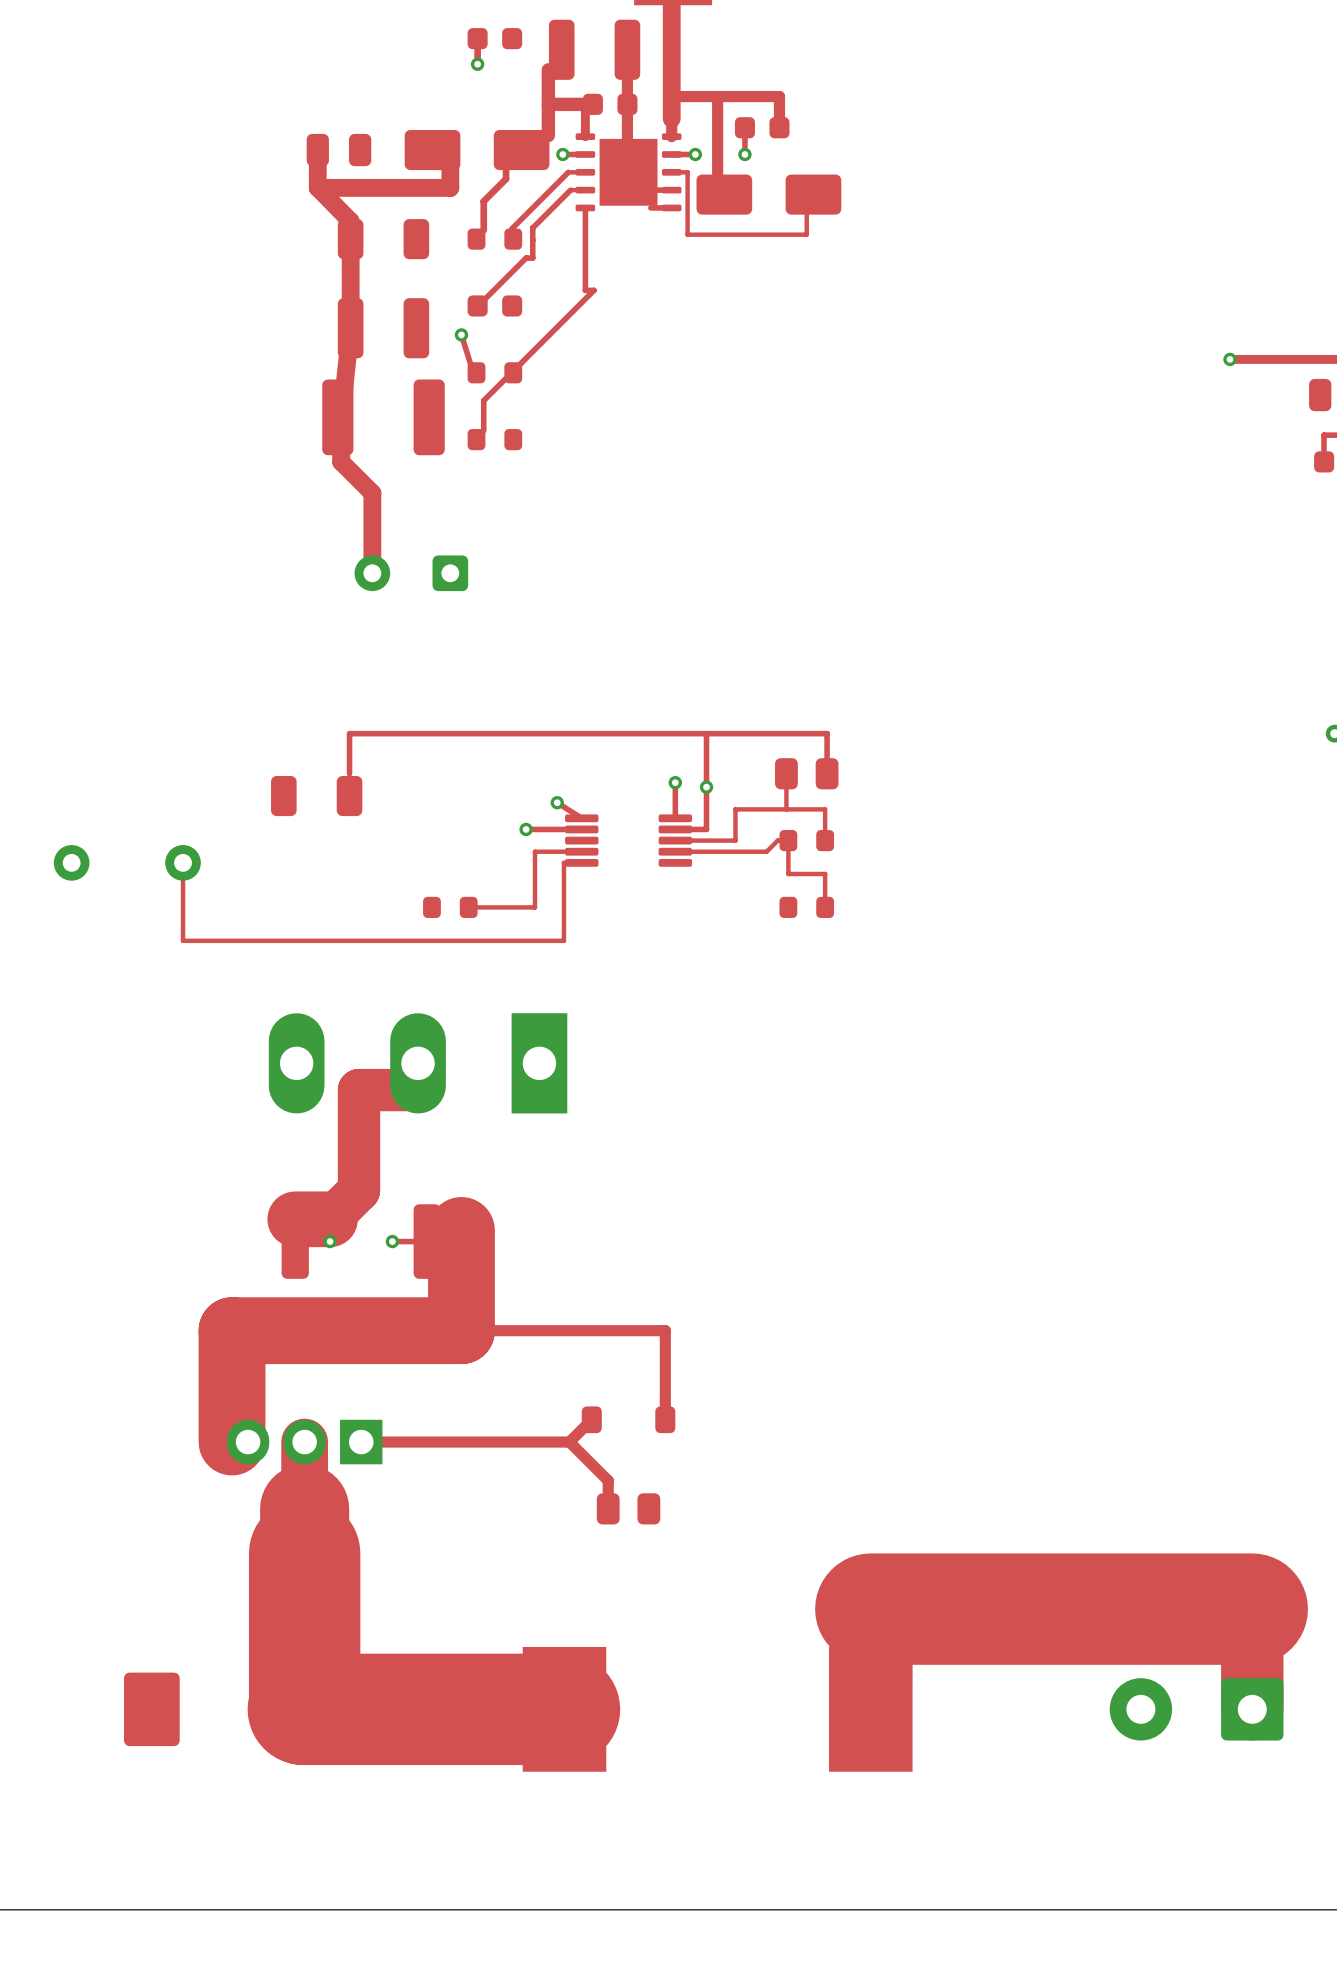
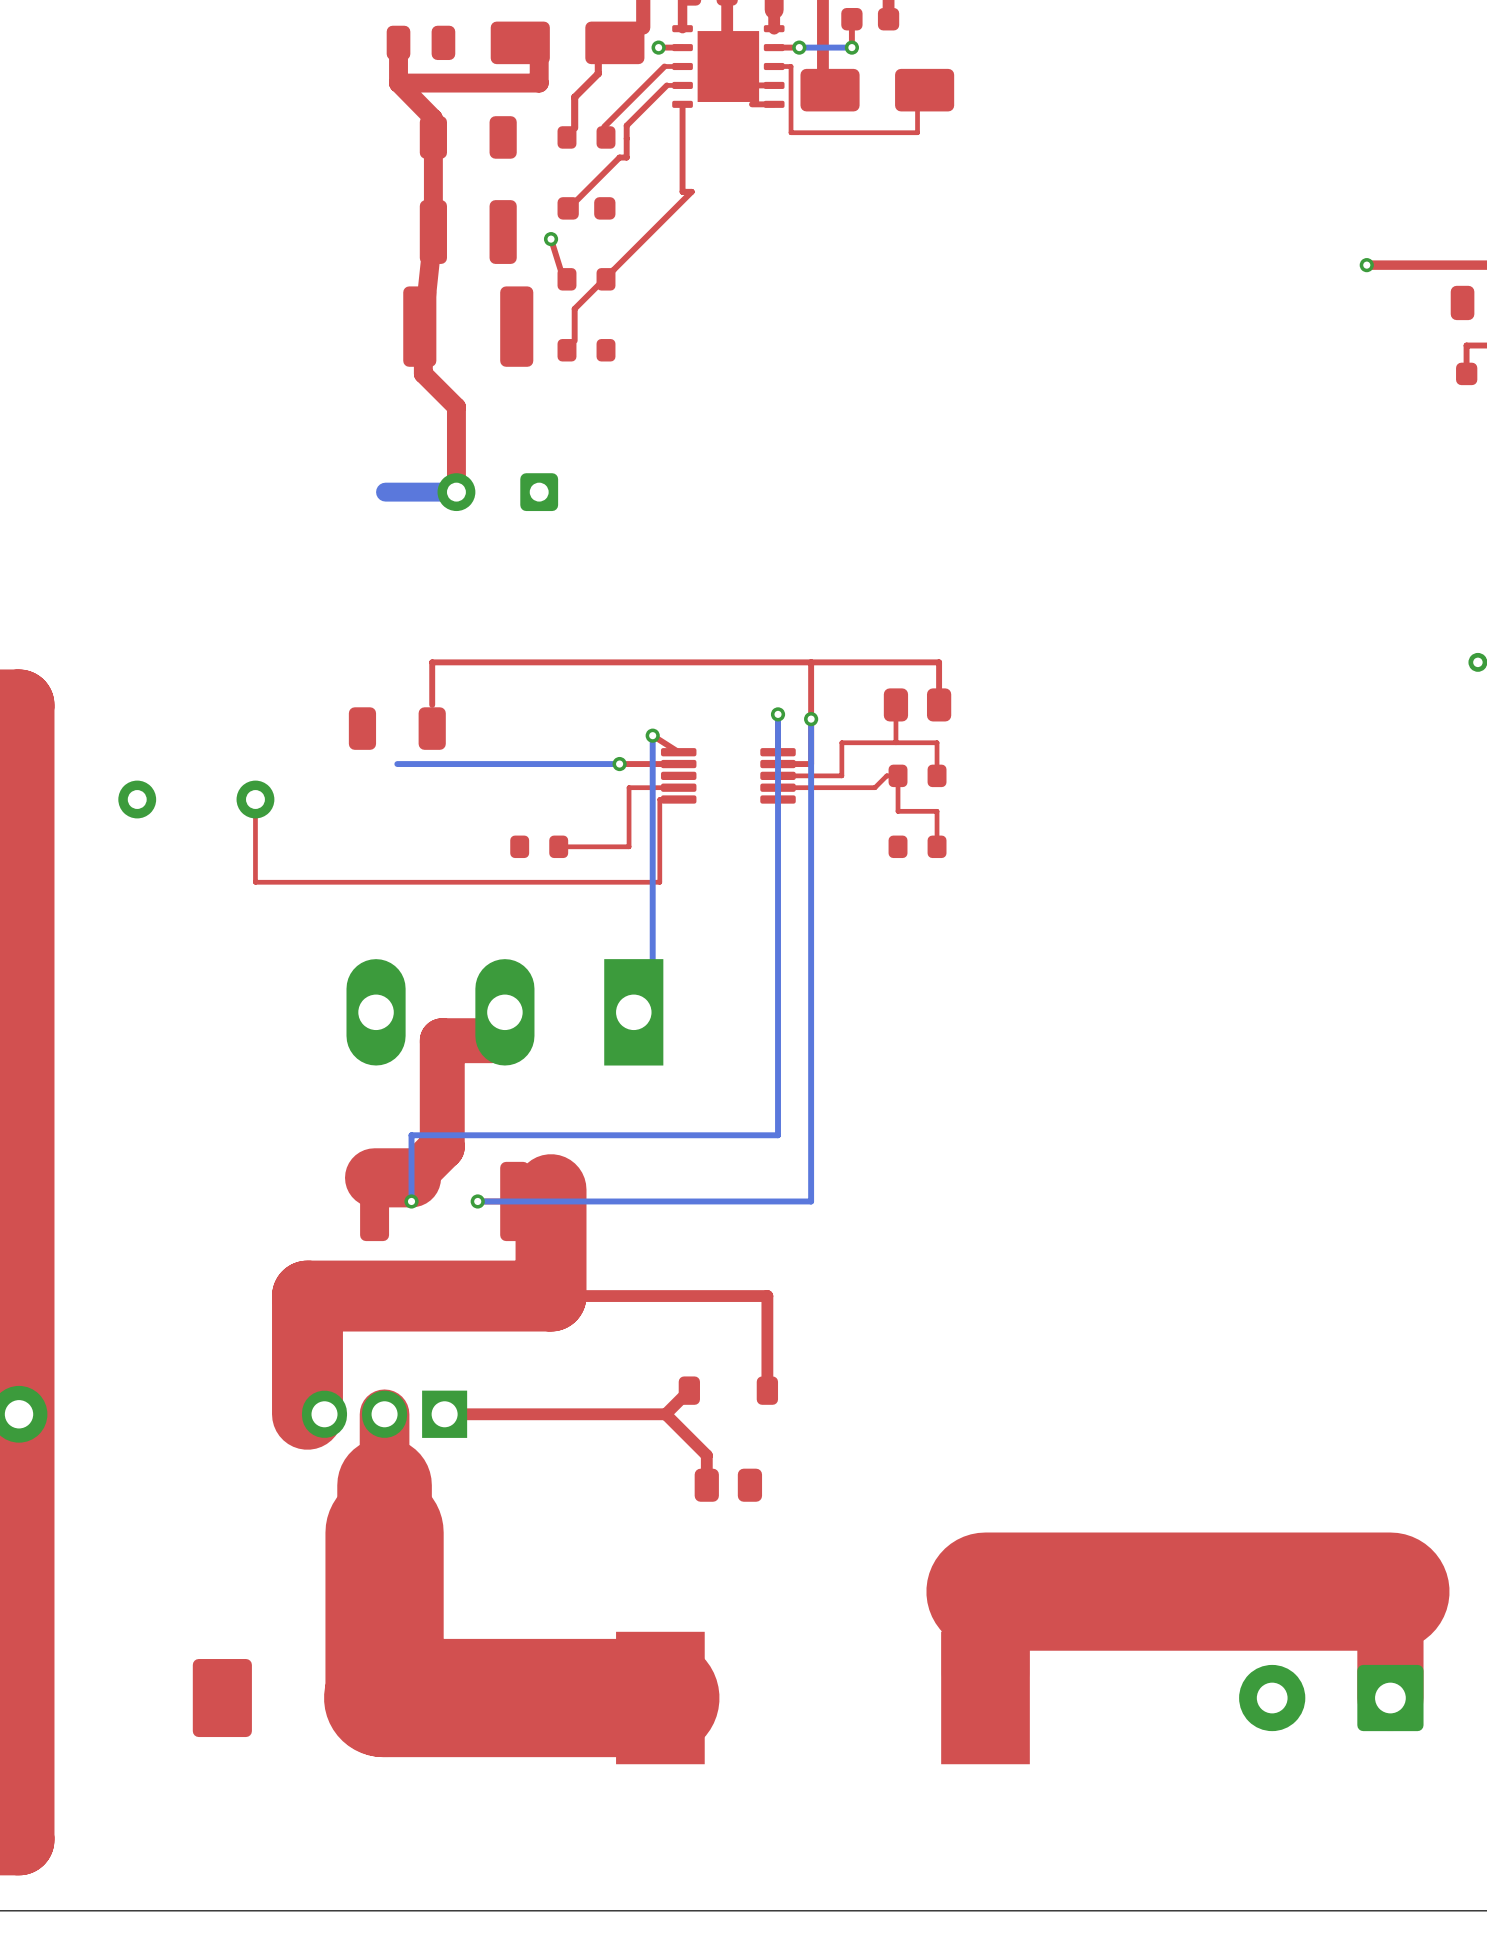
bottom track: none -> (851, 47) (799, 47)
bottom track: none -> (456, 492) (385, 492)
bottom track: none -> (778, 714) (778, 1135) (411, 1135) (411, 1201)
bottom track: none -> (811, 719) (811, 1201) (477, 1201)
bottom track: none -> (652, 735) (652, 976)
bottom track: none -> (619, 764) (397, 764)

